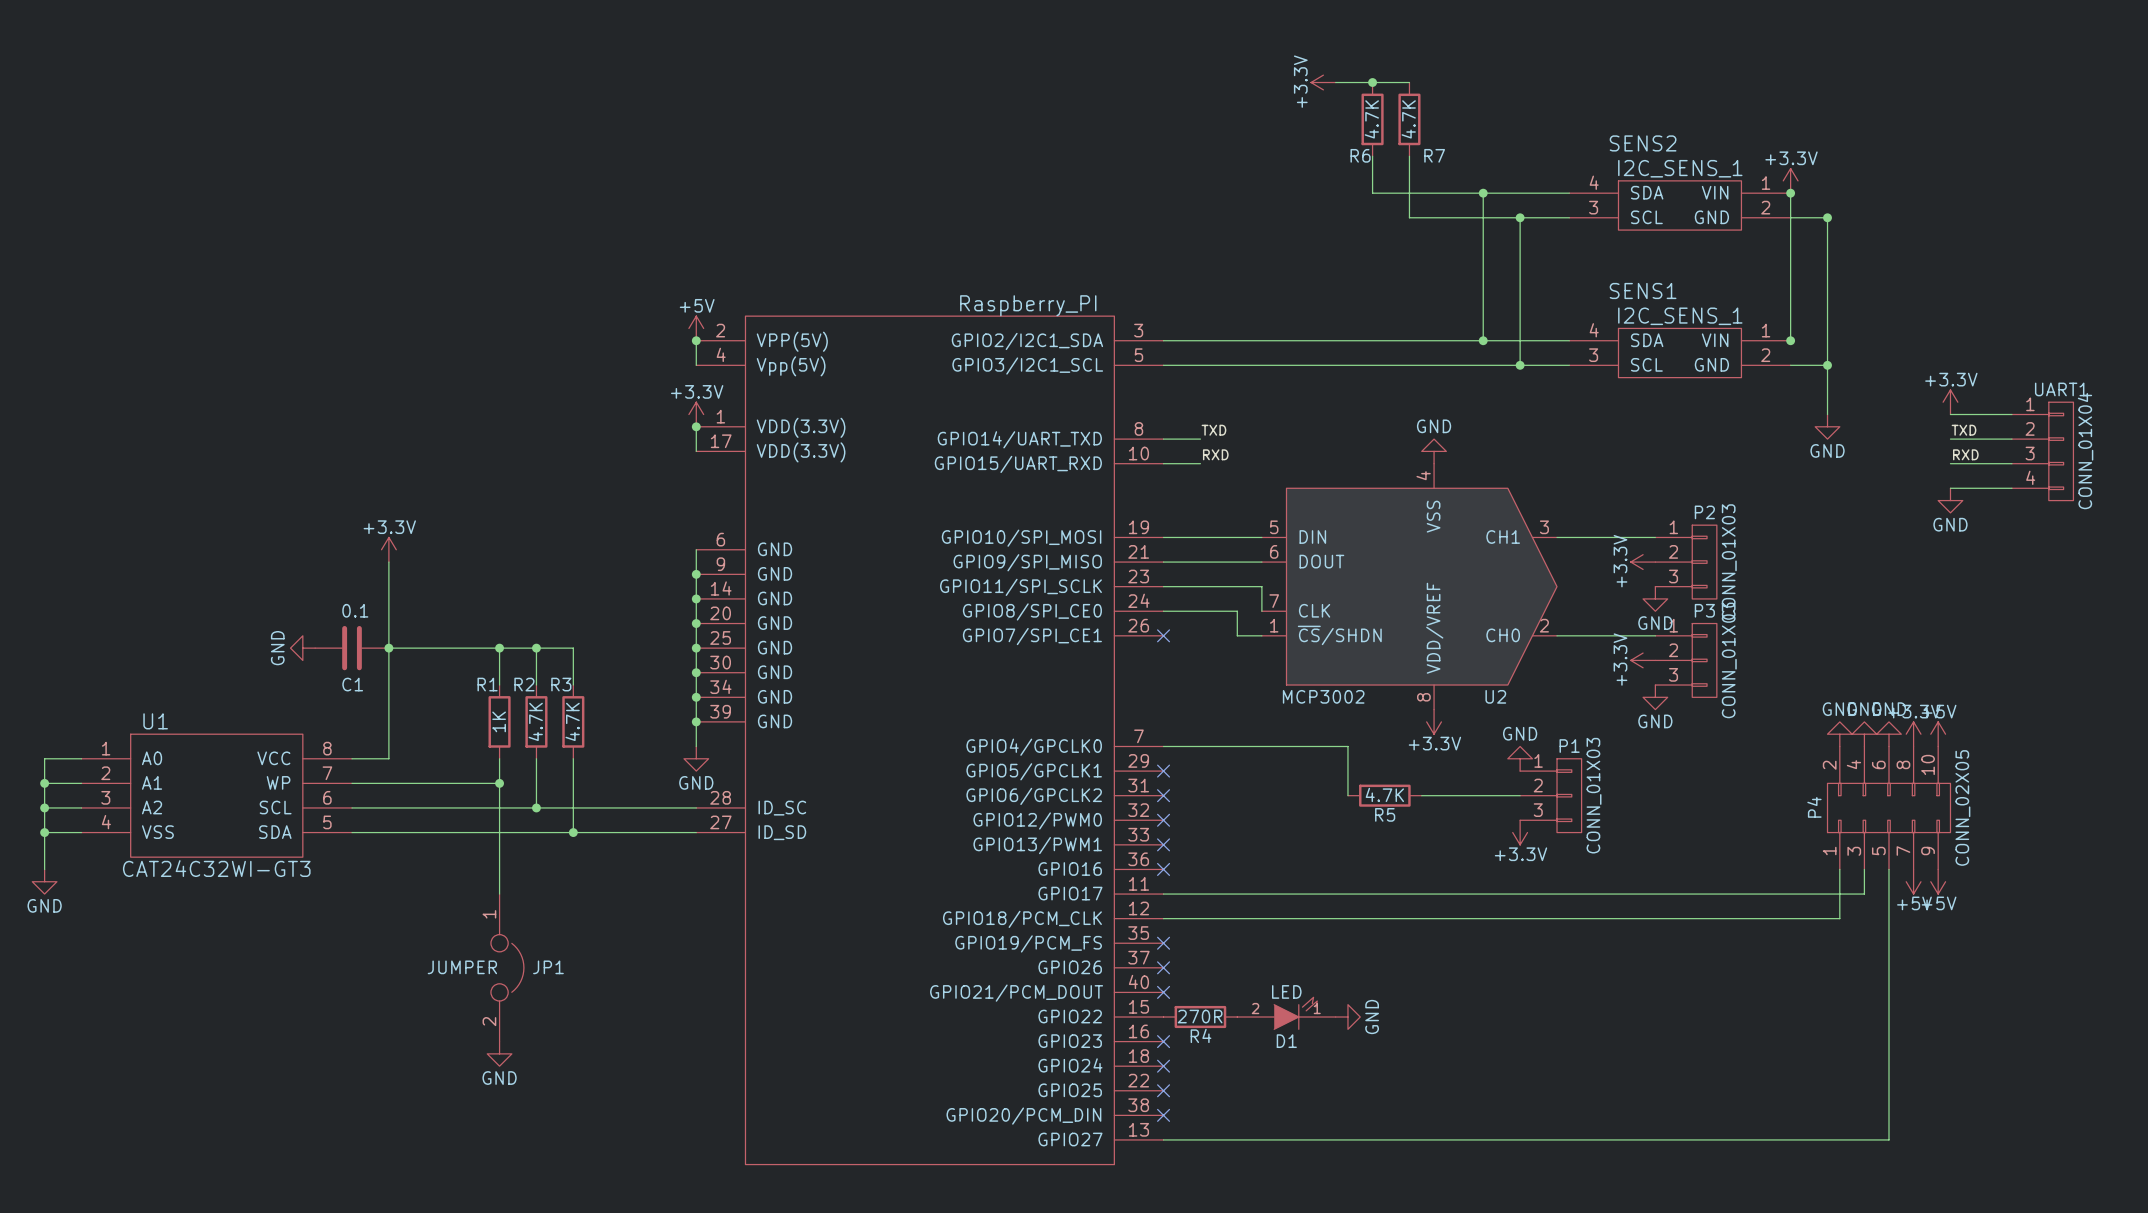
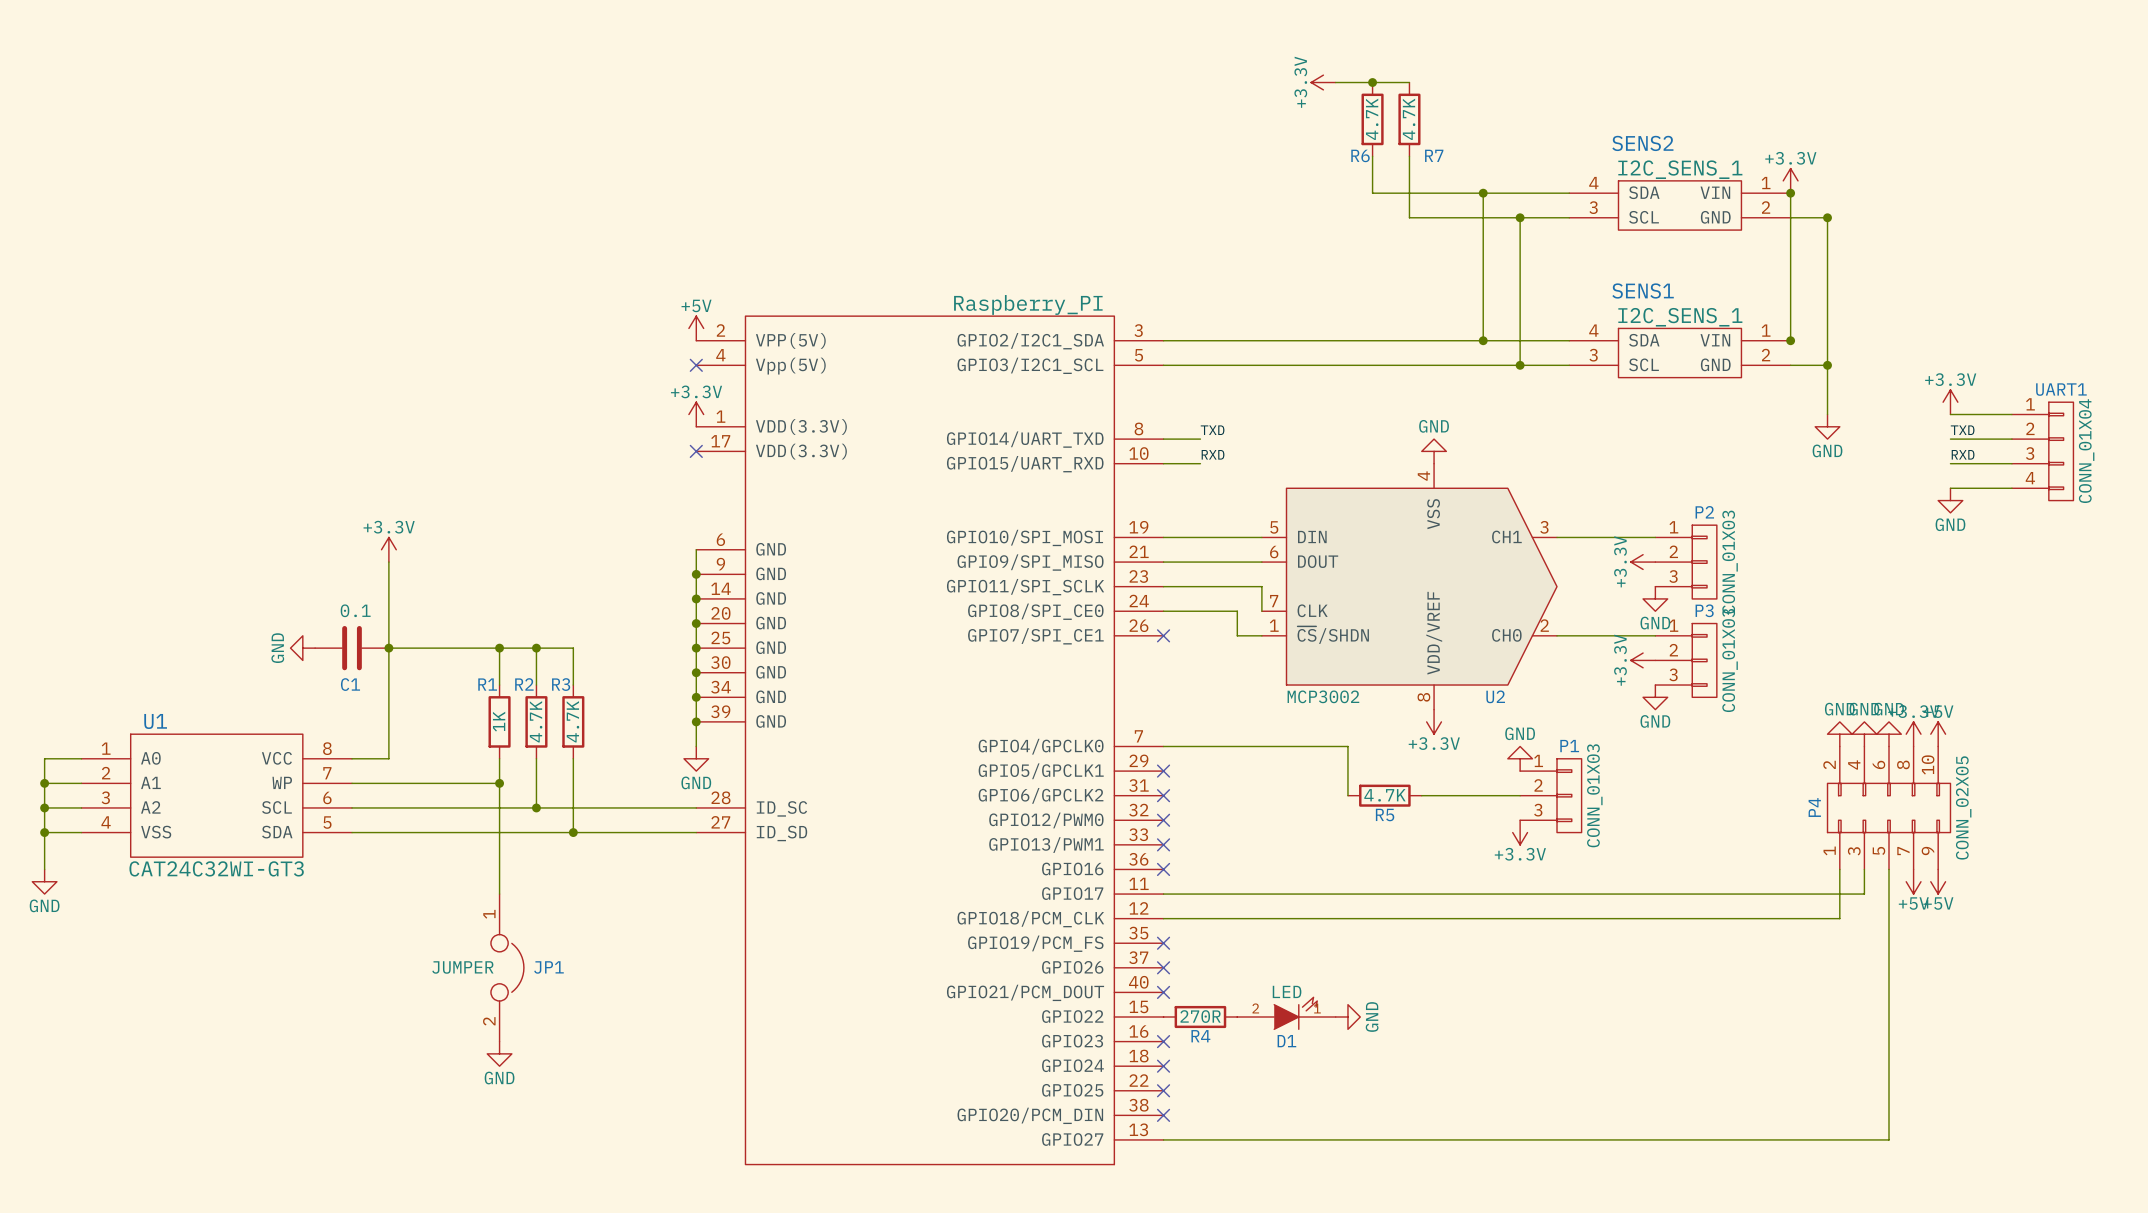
wire: (696, 340) (696, 365) -> none
junction: (696, 340) -> none
no-connect mark: none -> (696, 365)
wire: (696, 426) (696, 451) -> none
junction: (696, 426) -> none
no-connect mark: none -> (696, 451)

